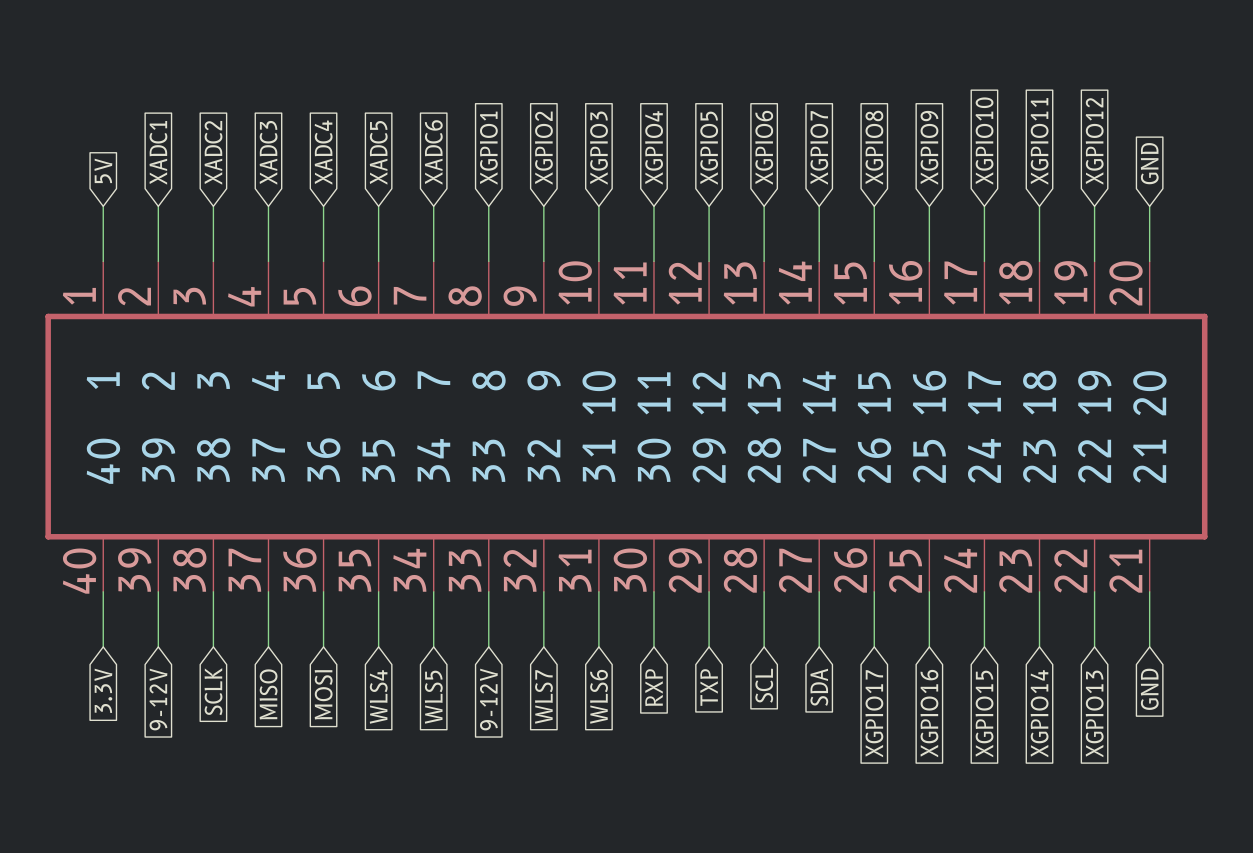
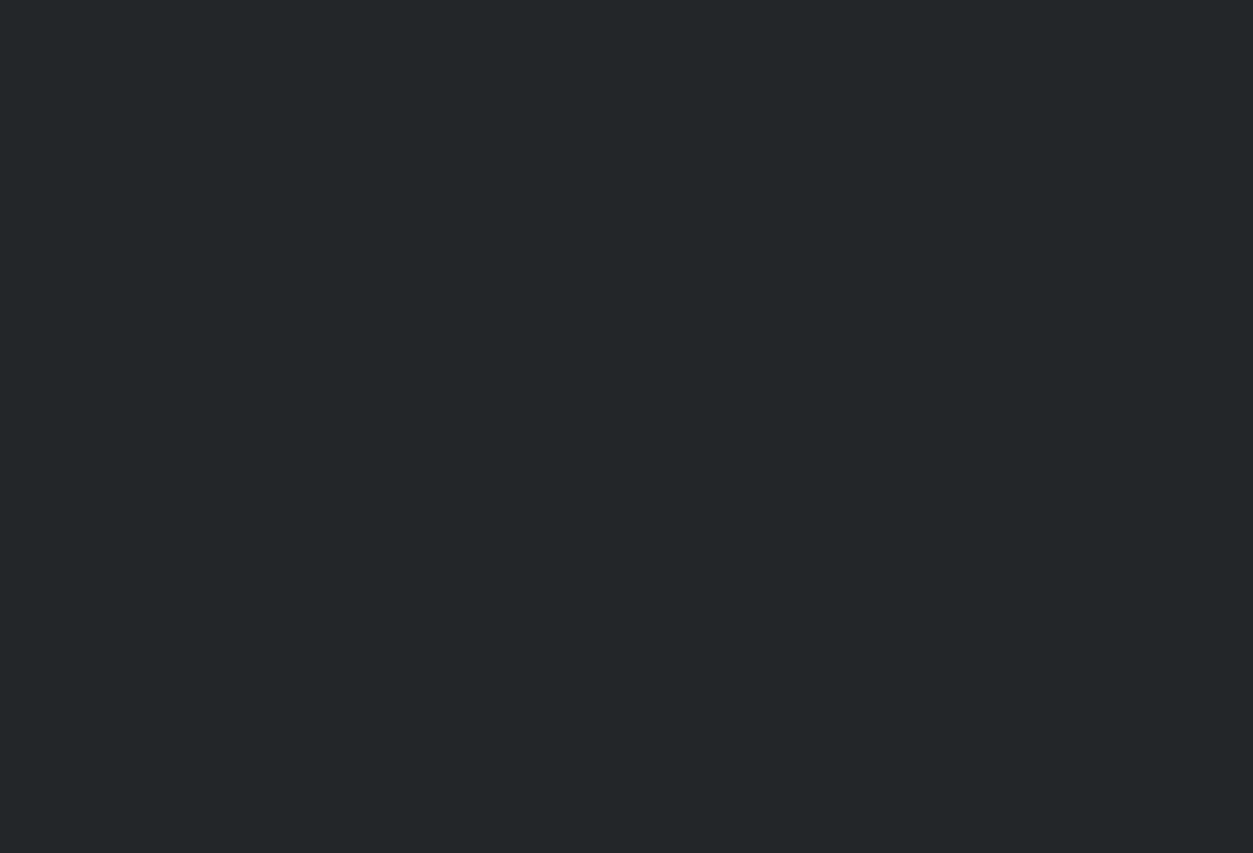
global label: XGPIO10 (984, 141) -> none
global label: XGPIO11 (1039, 141) -> none
global label: XGPIO12 (1094, 141) -> none
global label: XGPIO4 (654, 147) -> none
global label: XGPIO6 (764, 147) -> none
global label: XGPIO7 (819, 147) -> none
global label: XGPIO8 (874, 147) -> none
global label: XGPIO9 (929, 147) -> none
global label: XGPIO1 (488, 148) -> none
global label: XGPIO2 (543, 148) -> none
global label: XGPIO3 (599, 148) -> none
global label: XGPIO5 (709, 148) -> none
global label: XADC1 (158, 152) -> none
global label: XADC2 (213, 152) -> none
global label: XADC3 (268, 152) -> none
global label: XADC4 (323, 152) -> none
global label: XADC5 (378, 152) -> none
global label: XADC6 (433, 152) -> none
global label: GND (1149, 163) -> none
global label: 5V (103, 170) -> none
wire: (103, 206) (103, 261) -> none
wire: (158, 206) (158, 261) -> none
wire: (213, 206) (213, 261) -> none
wire: (268, 206) (268, 261) -> none
wire: (323, 206) (323, 261) -> none
wire: (378, 206) (378, 261) -> none
wire: (433, 206) (433, 261) -> none
wire: (488, 206) (488, 261) -> none
wire: (543, 206) (543, 261) -> none
wire: (598, 206) (598, 261) -> none
wire: (653, 206) (653, 261) -> none
wire: (709, 206) (709, 261) -> none
wire: (764, 206) (764, 261) -> none
wire: (819, 206) (819, 261) -> none
wire: (874, 206) (874, 261) -> none
wire: (929, 206) (929, 261) -> none
wire: (984, 206) (984, 261) -> none
wire: (1039, 206) (1039, 261) -> none
wire: (1094, 206) (1094, 261) -> none
wire: (1149, 206) (1149, 261) -> none
part: (626, 426) -> none
wire: (103, 591) (103, 646) -> none
wire: (158, 591) (158, 646) -> none
wire: (213, 591) (213, 646) -> none
wire: (268, 591) (268, 646) -> none
wire: (323, 591) (323, 646) -> none
wire: (378, 591) (378, 646) -> none
wire: (433, 591) (433, 646) -> none
wire: (488, 591) (488, 646) -> none
wire: (543, 591) (543, 646) -> none
wire: (598, 591) (598, 646) -> none
wire: (653, 591) (653, 646) -> none
wire: (709, 591) (709, 646) -> none
wire: (764, 591) (764, 646) -> none
wire: (819, 591) (819, 646) -> none
wire: (874, 591) (874, 646) -> none
wire: (929, 591) (929, 646) -> none
wire: (984, 591) (984, 646) -> none
wire: (1039, 591) (1039, 646) -> none
wire: (1094, 591) (1094, 646) -> none
wire: (1149, 591) (1149, 646) -> none
global label: SCL (764, 685) -> none
global label: RXP (653, 687) -> none
global label: TXP (709, 687) -> none
global label: SDA (819, 687) -> none
global label: GND (1149, 689) -> none
global label: 3.3V (103, 690) -> none
global label: SCLK (213, 691) -> none
global label: MISO (268, 694) -> none
global label: MOSI (323, 694) -> none
global label: WLS4 (378, 696) -> none
global label: WLS7 (543, 696) -> none
global label: WLS6 (599, 696) -> none
global label: WLS5 (433, 697) -> none
global label: 9-12V (158, 699) -> none
global label: 9-12V (488, 699) -> none
global label: XGPIO17 (874, 713) -> none
global label: XGPIO16 (929, 713) -> none
global label: XGPIO15 (984, 713) -> none
global label: XGPIO14 (1039, 713) -> none
global label: XGPIO13 (1094, 713) -> none

